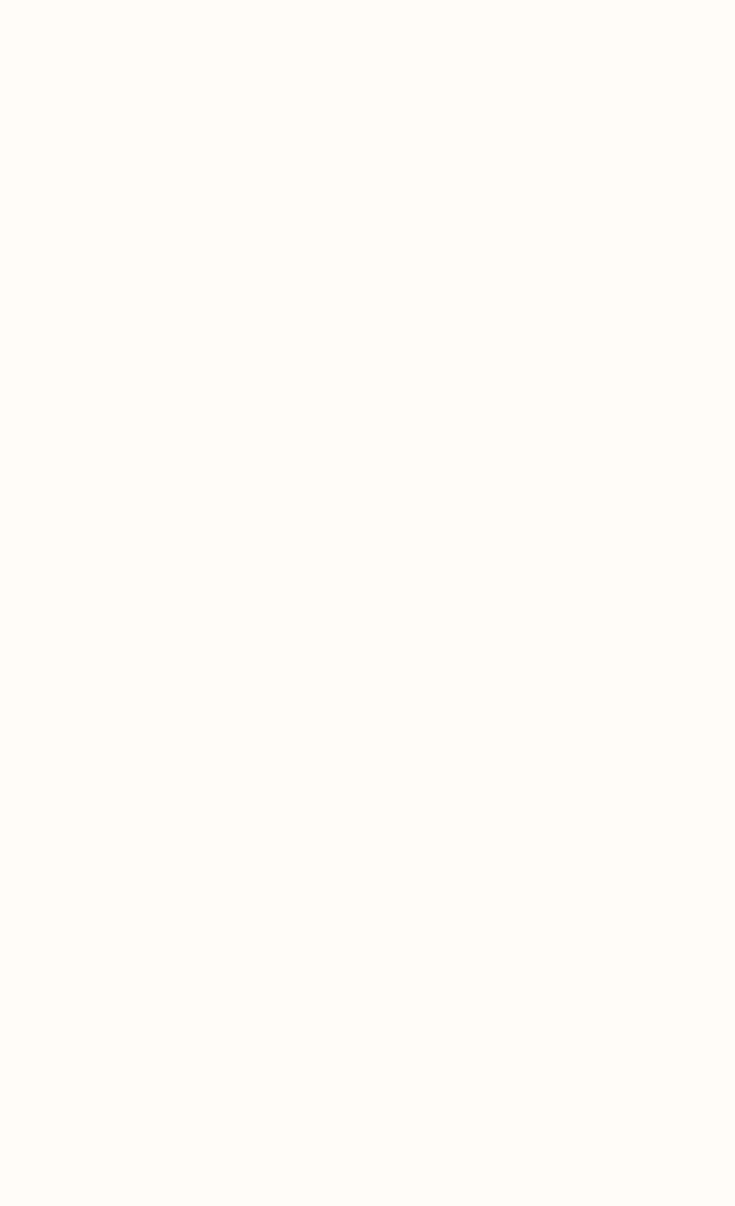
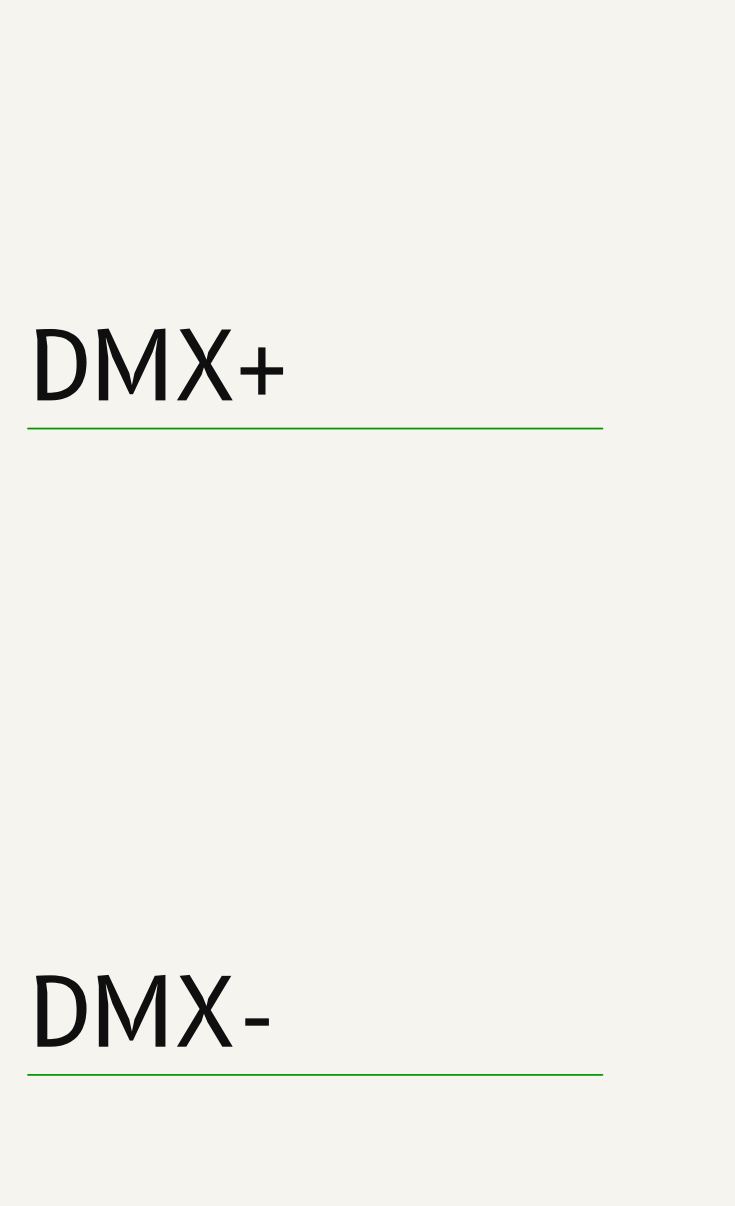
label: none -> DMX+ (159, 364)
wire: none -> (27, 428) (602, 428)
label: none -> DMX- (152, 1010)
wire: none -> (27, 1074) (602, 1074)

